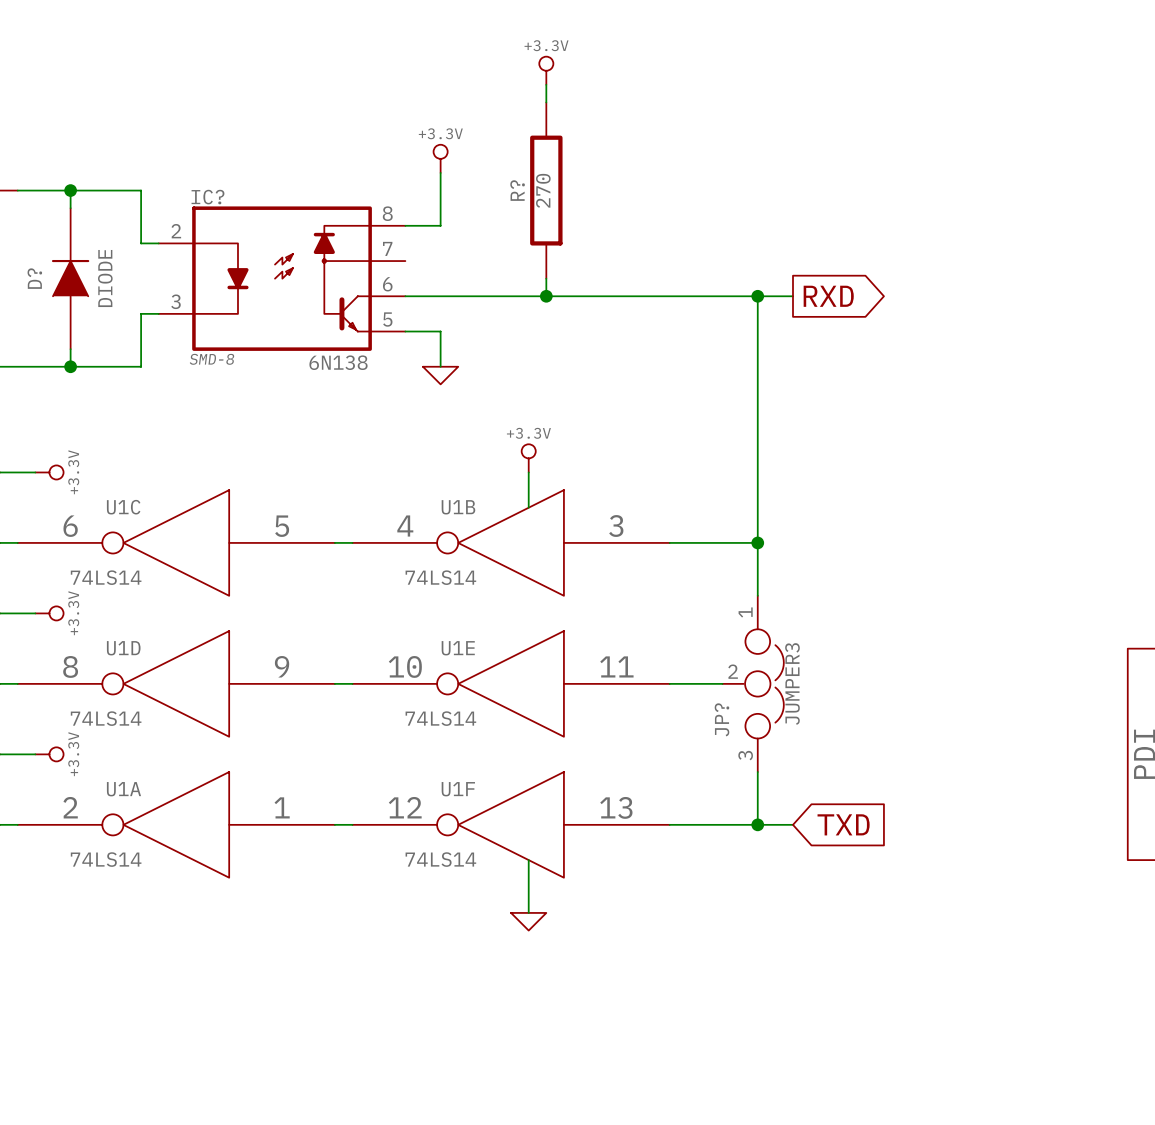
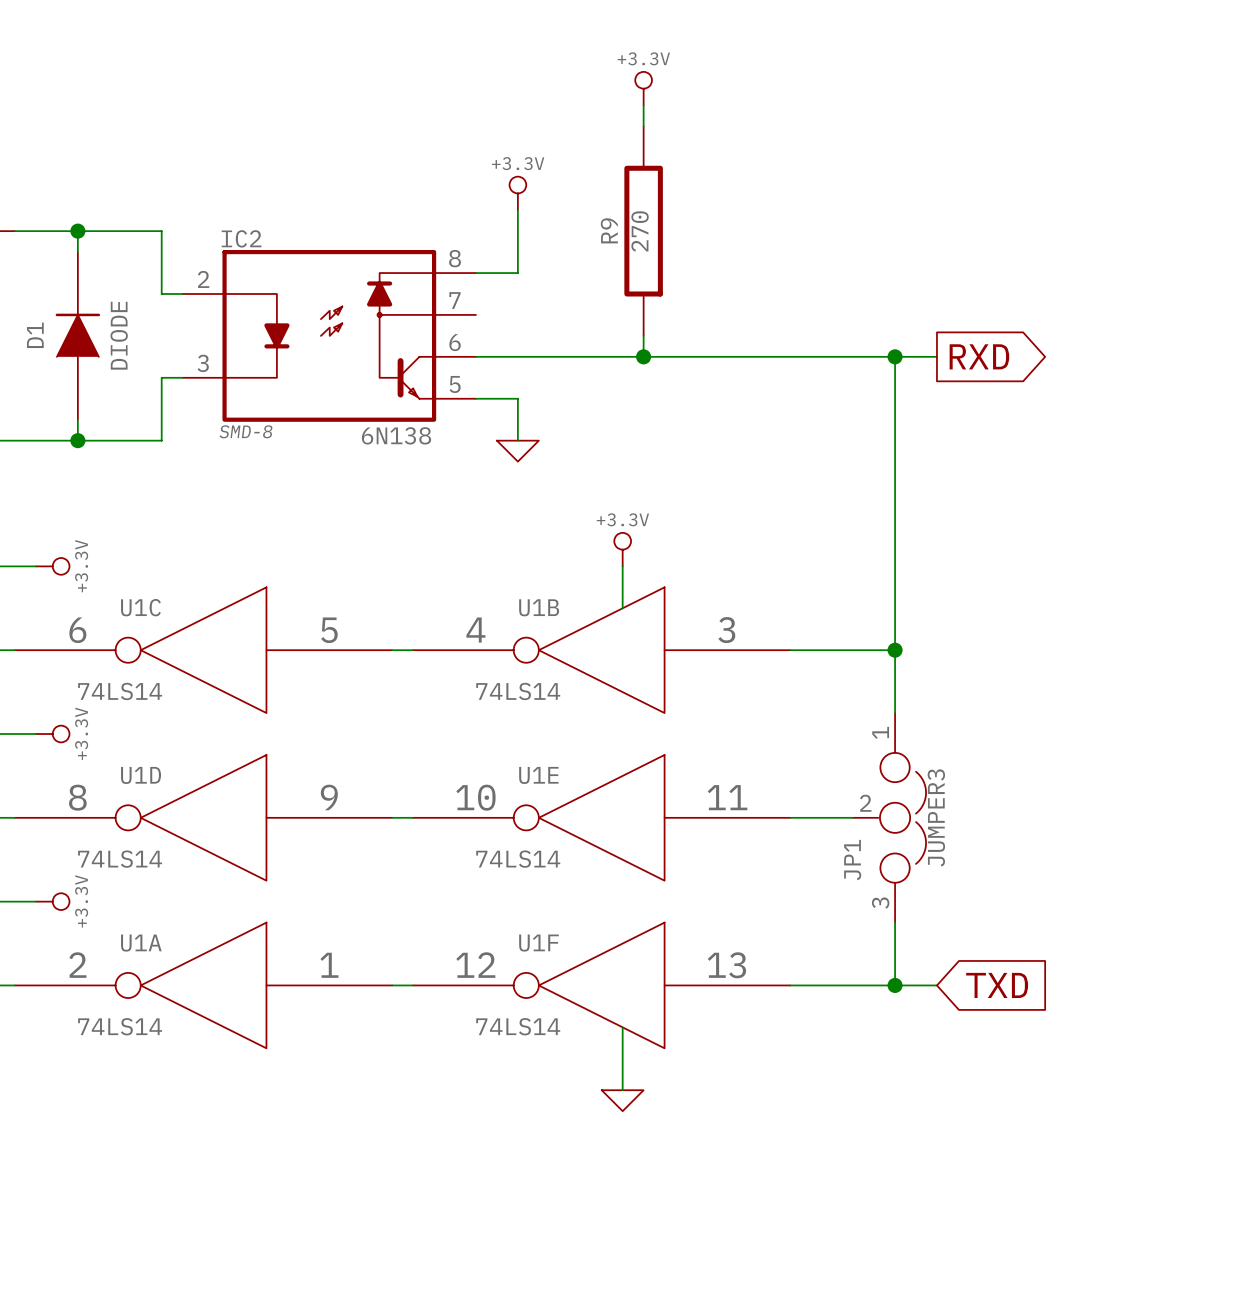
R? name: R? (517, 190) -> R9 (609, 230)
IC? name: IC? (207, 197) -> IC2 (241, 238)
D? name: D? (34, 278) -> D1 (35, 335)
JP? name: JP? (721, 719) -> JP1 (852, 860)

